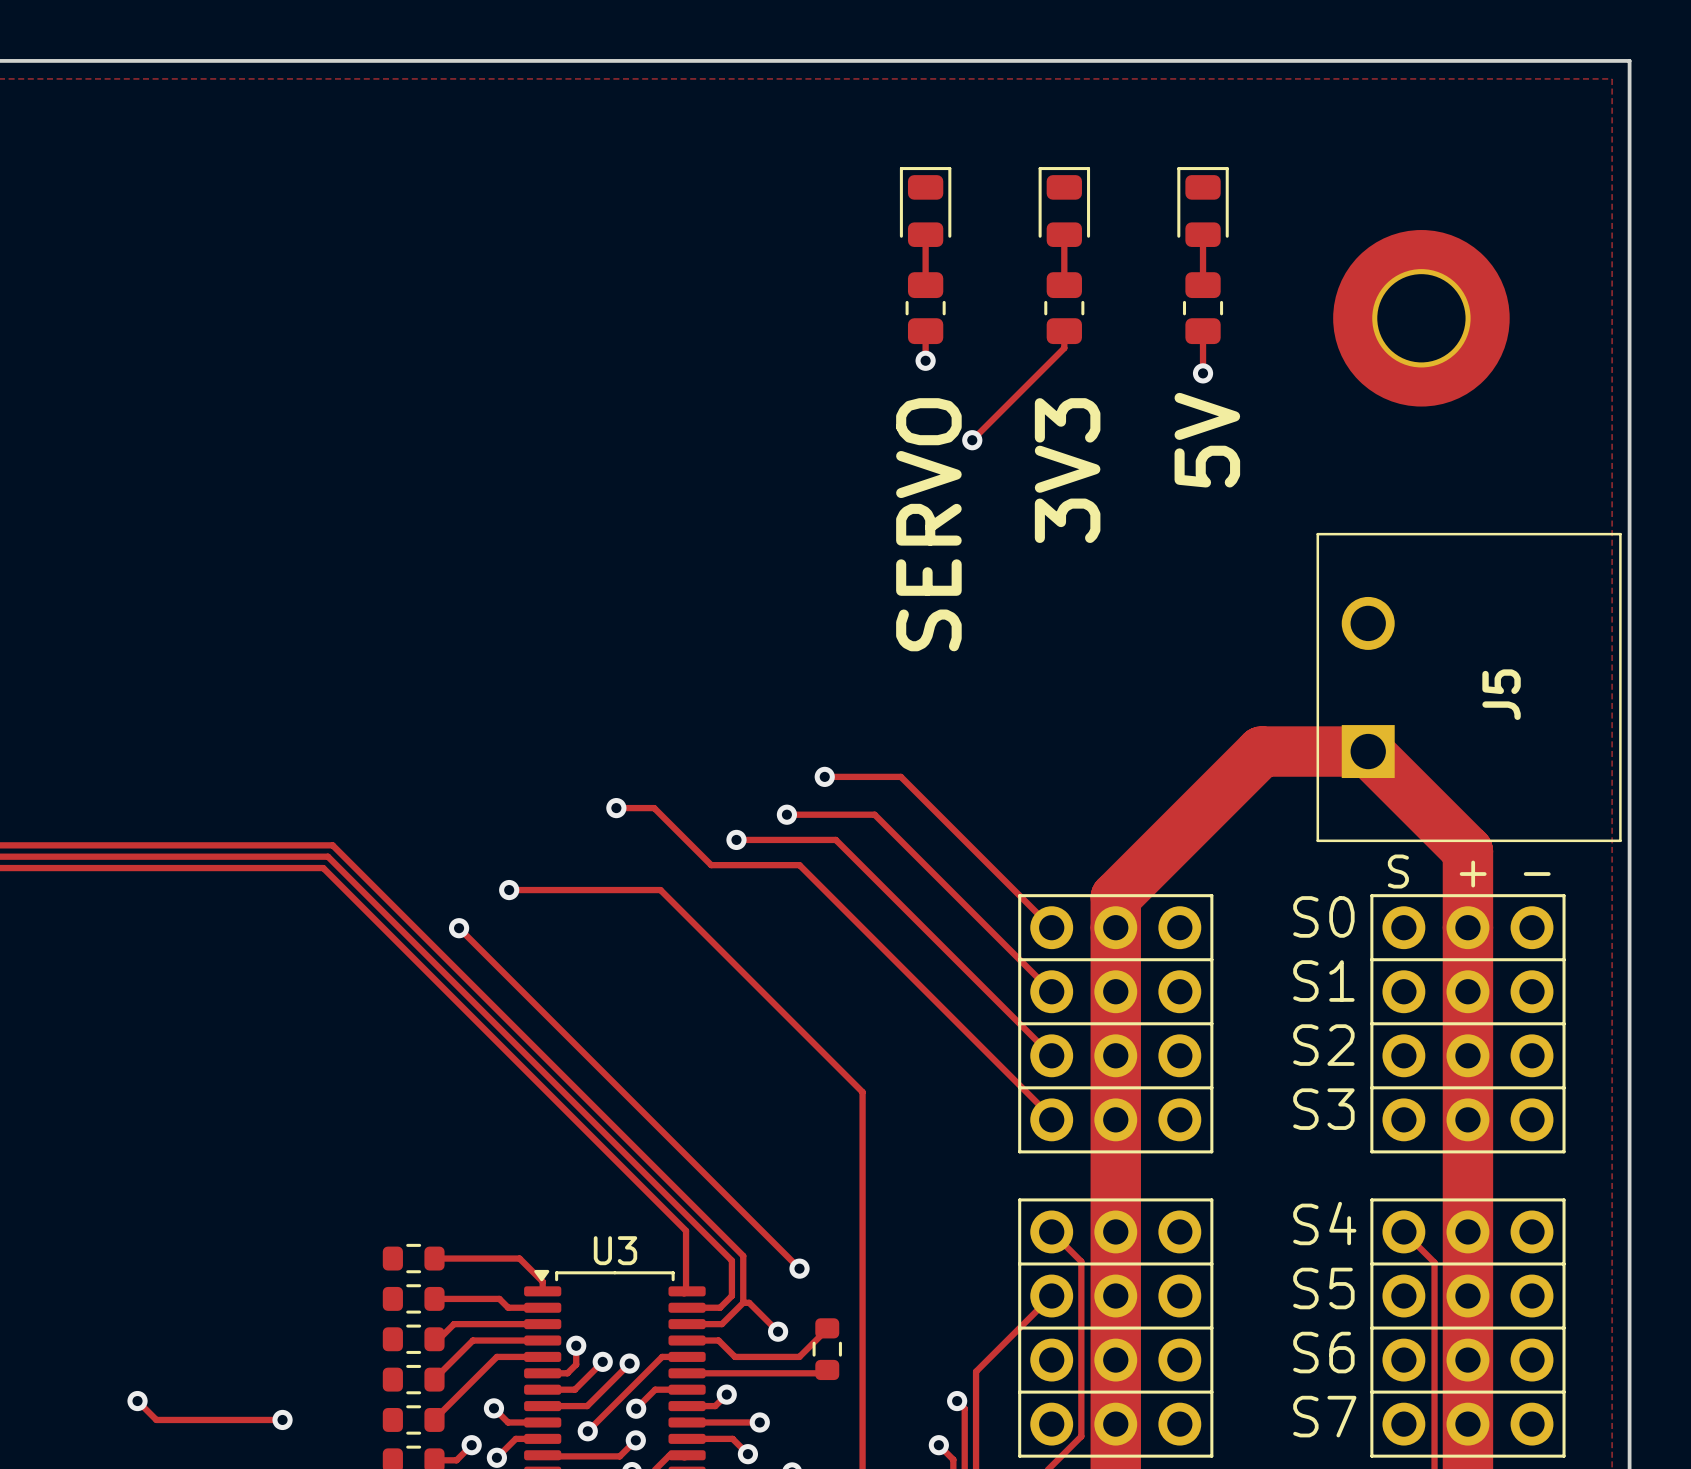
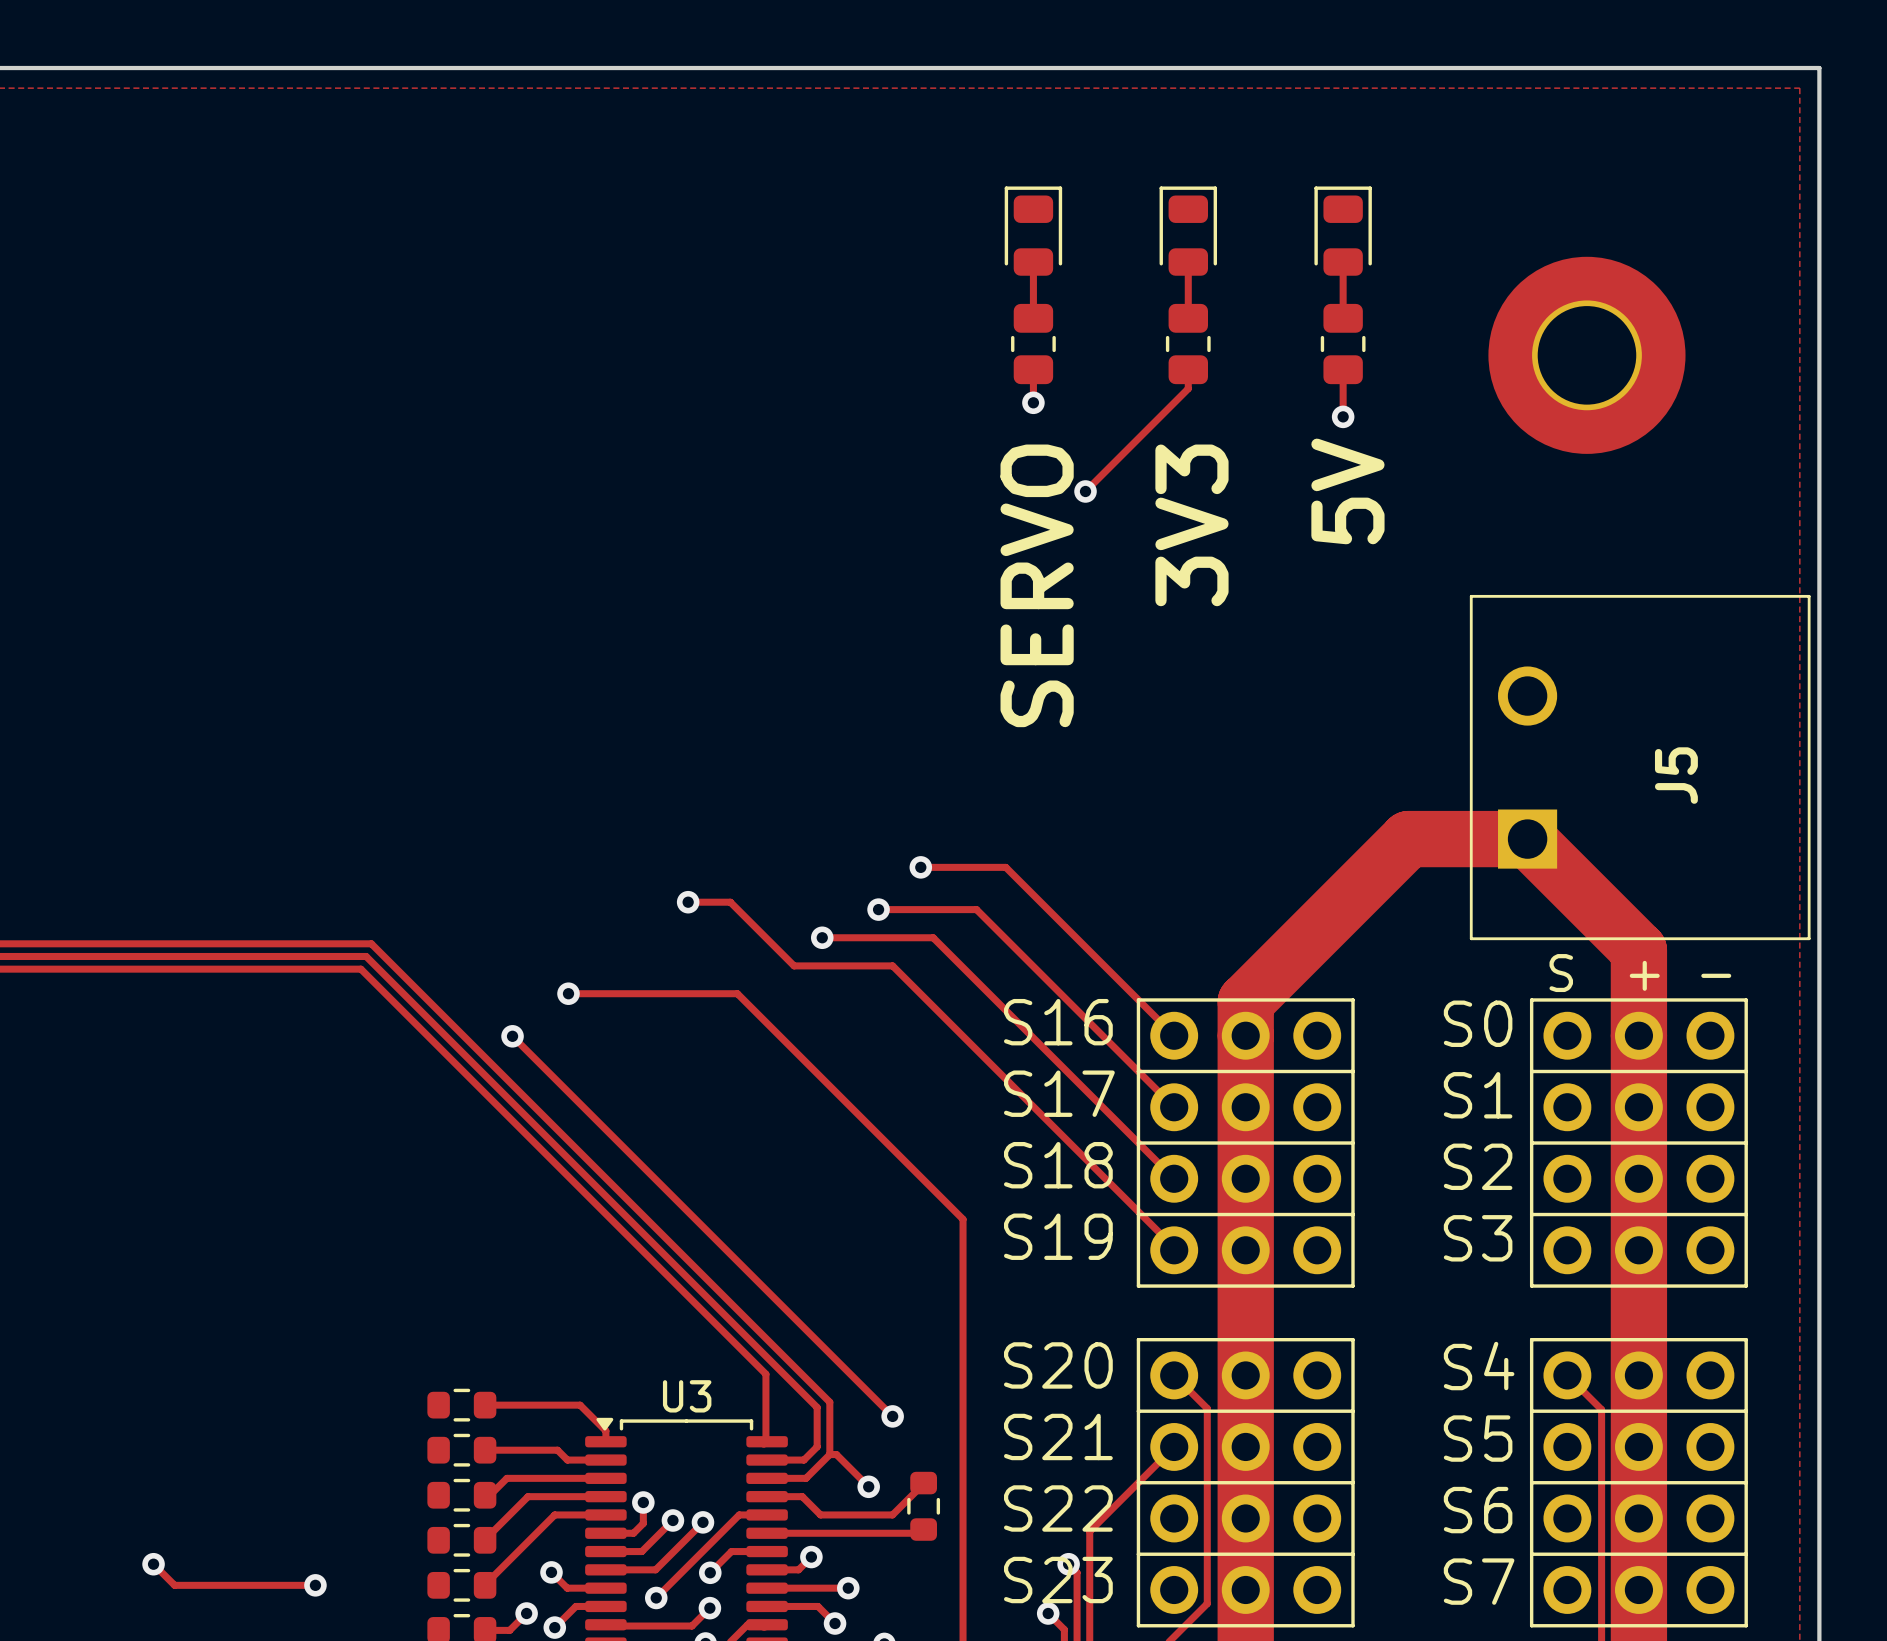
text: none -> S16 (1058, 1022)
text: none -> S17 (1059, 1093)
text: none -> S18 (1058, 1165)
text: none -> S19 (1058, 1236)
text: none -> S20 (1058, 1365)
text: none -> S21 (1058, 1436)
text: none -> S22 (1058, 1508)
text: none -> S23 (1058, 1580)

